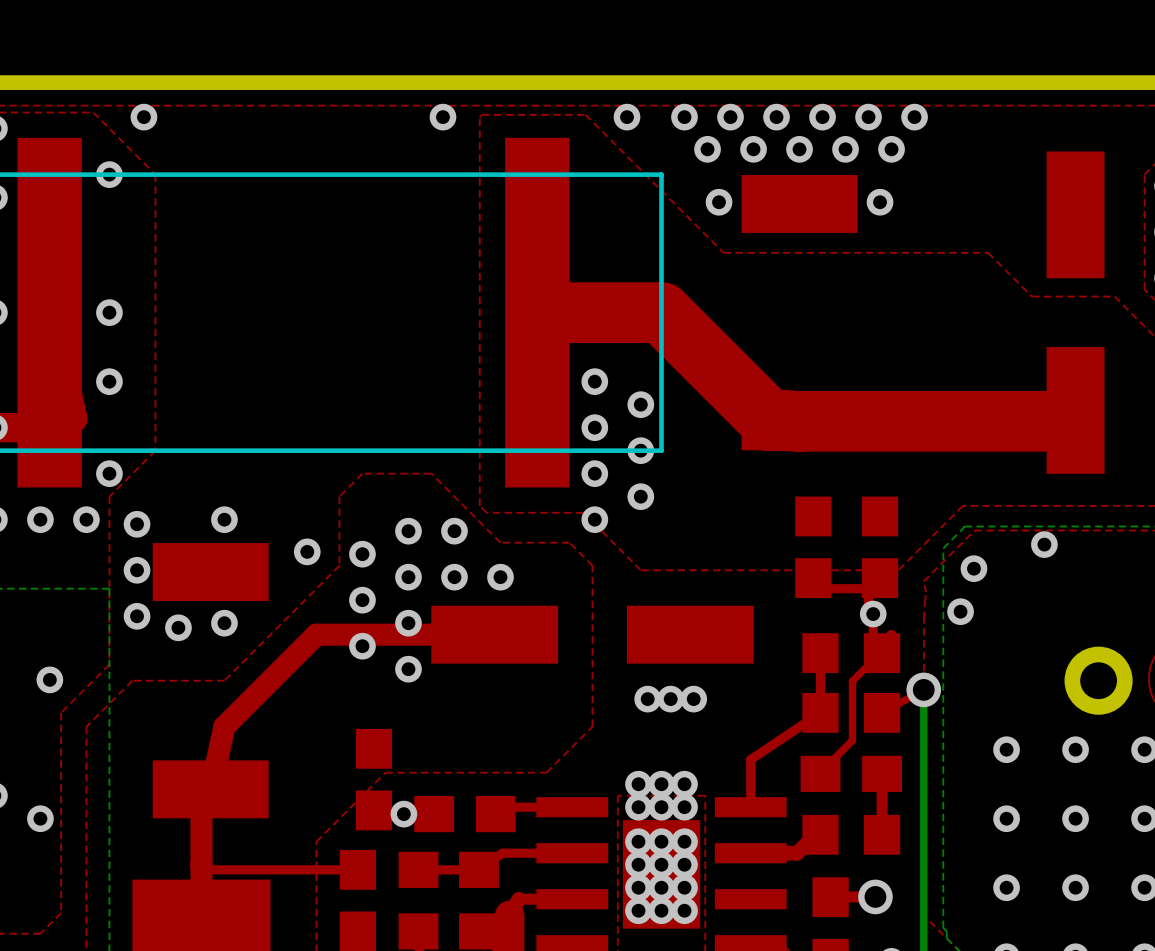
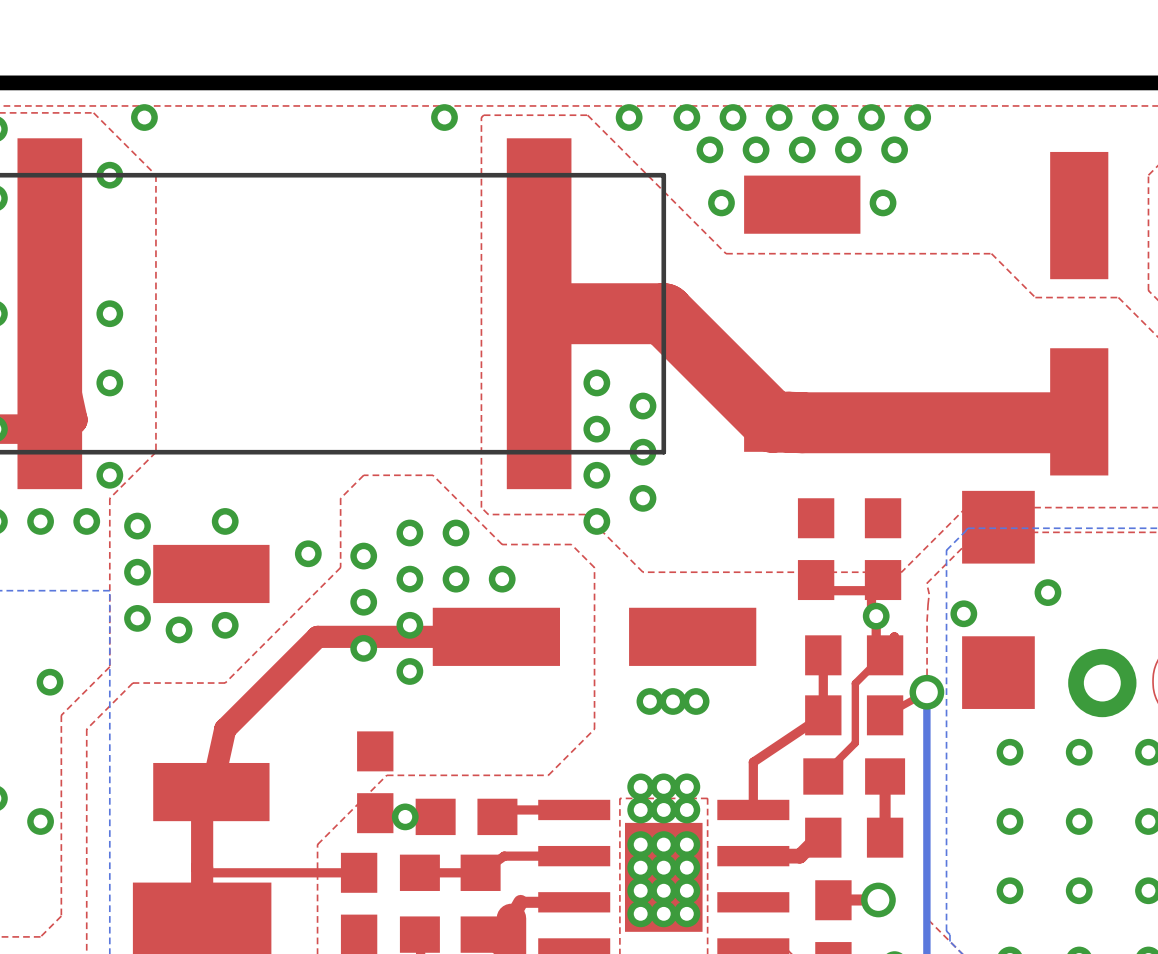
via: (1044, 544) -> none
via: (973, 568) -> none
via: none -> (1047, 592)
part: none -> (998, 599)

